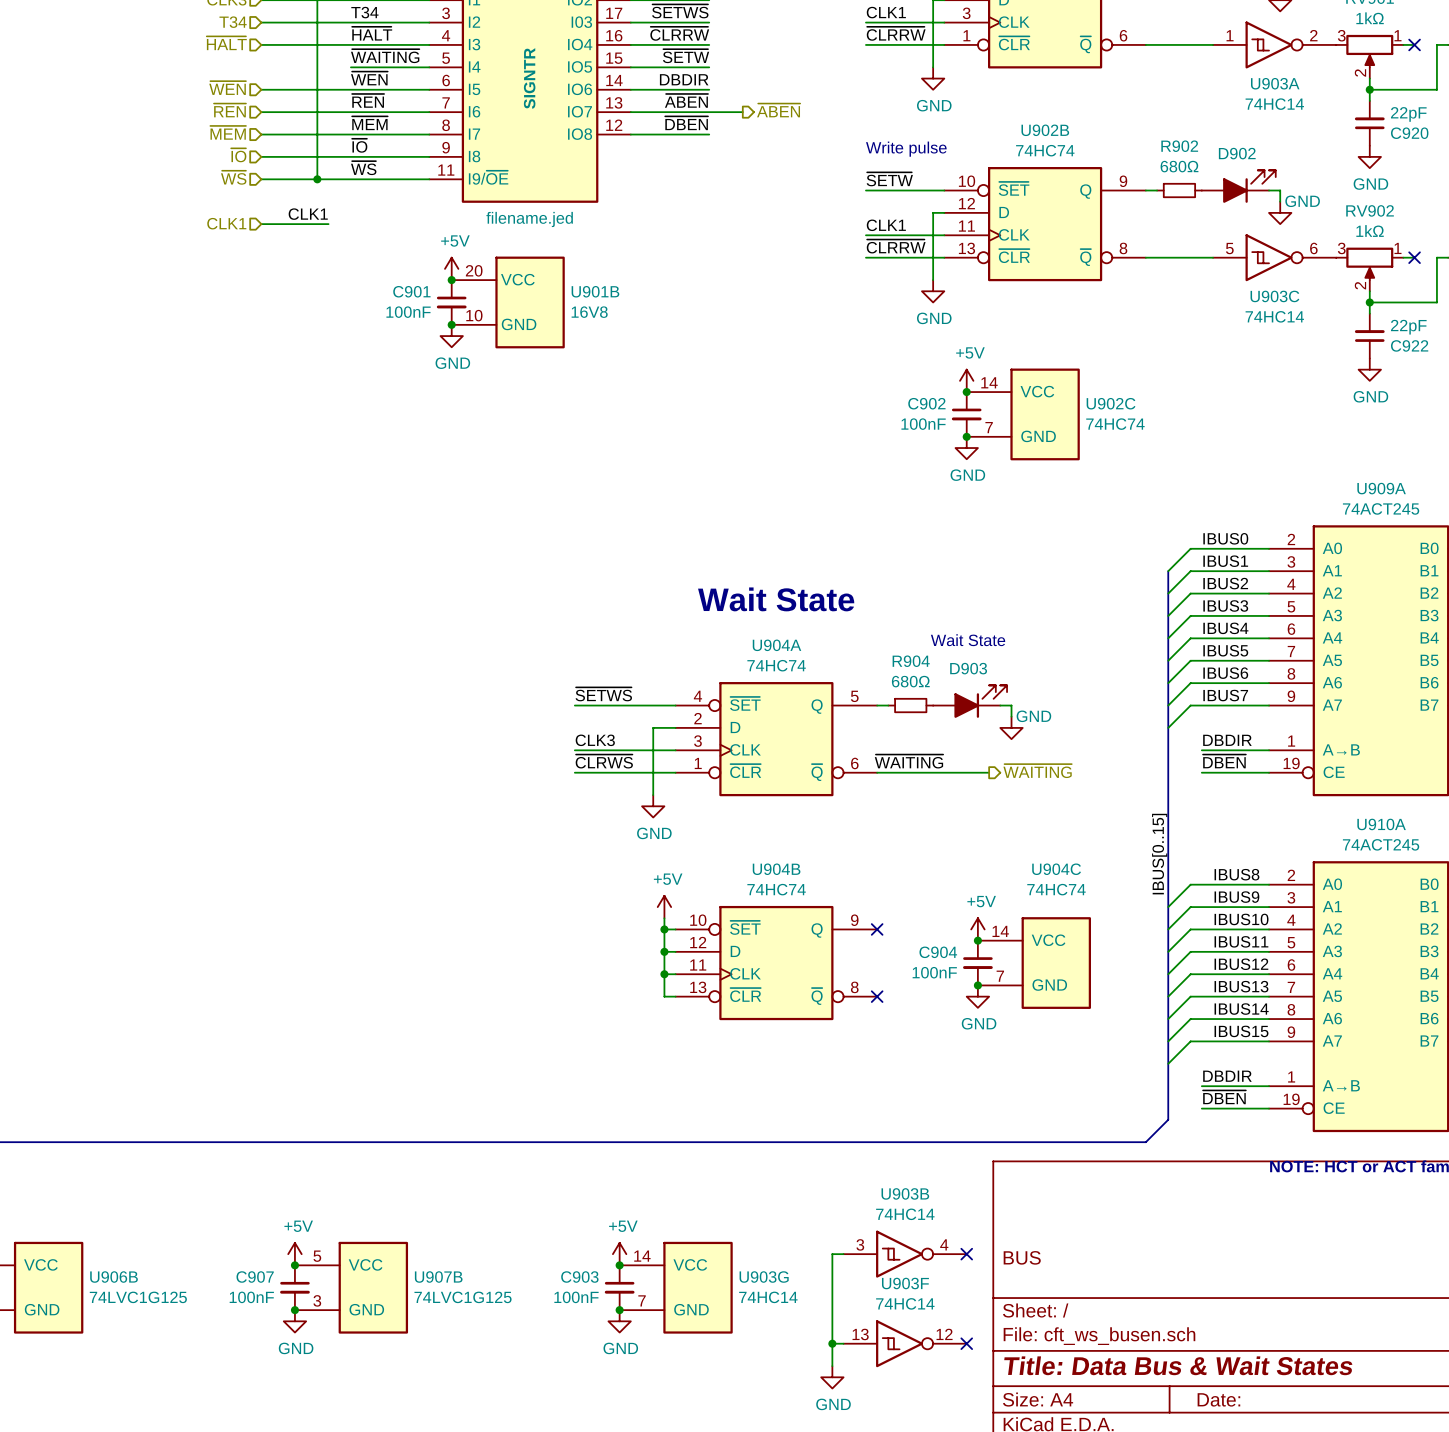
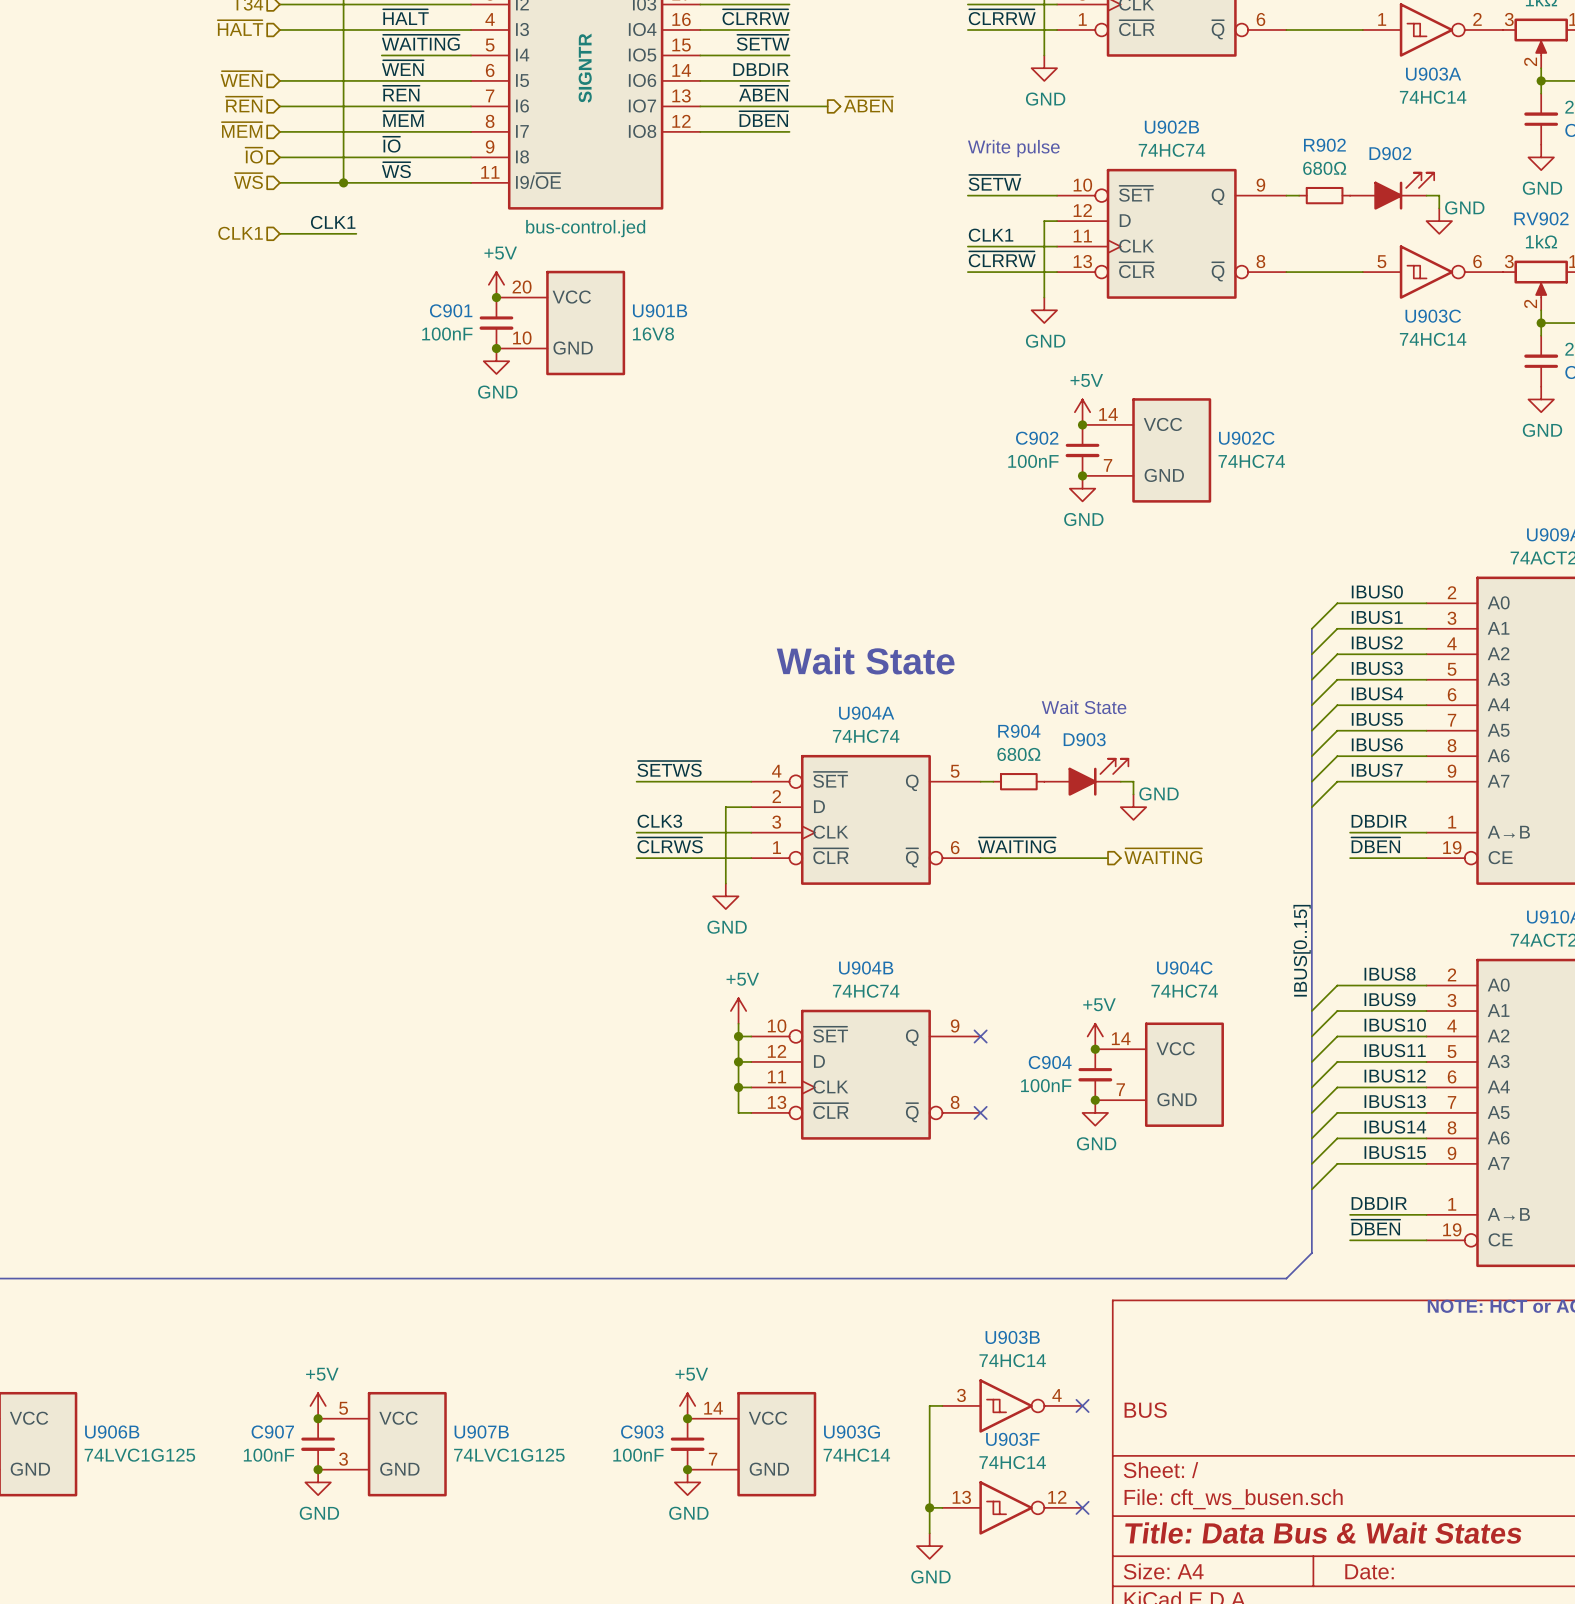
part text: filename.jed (529, 219) -> bus-control.jed (585, 228)

